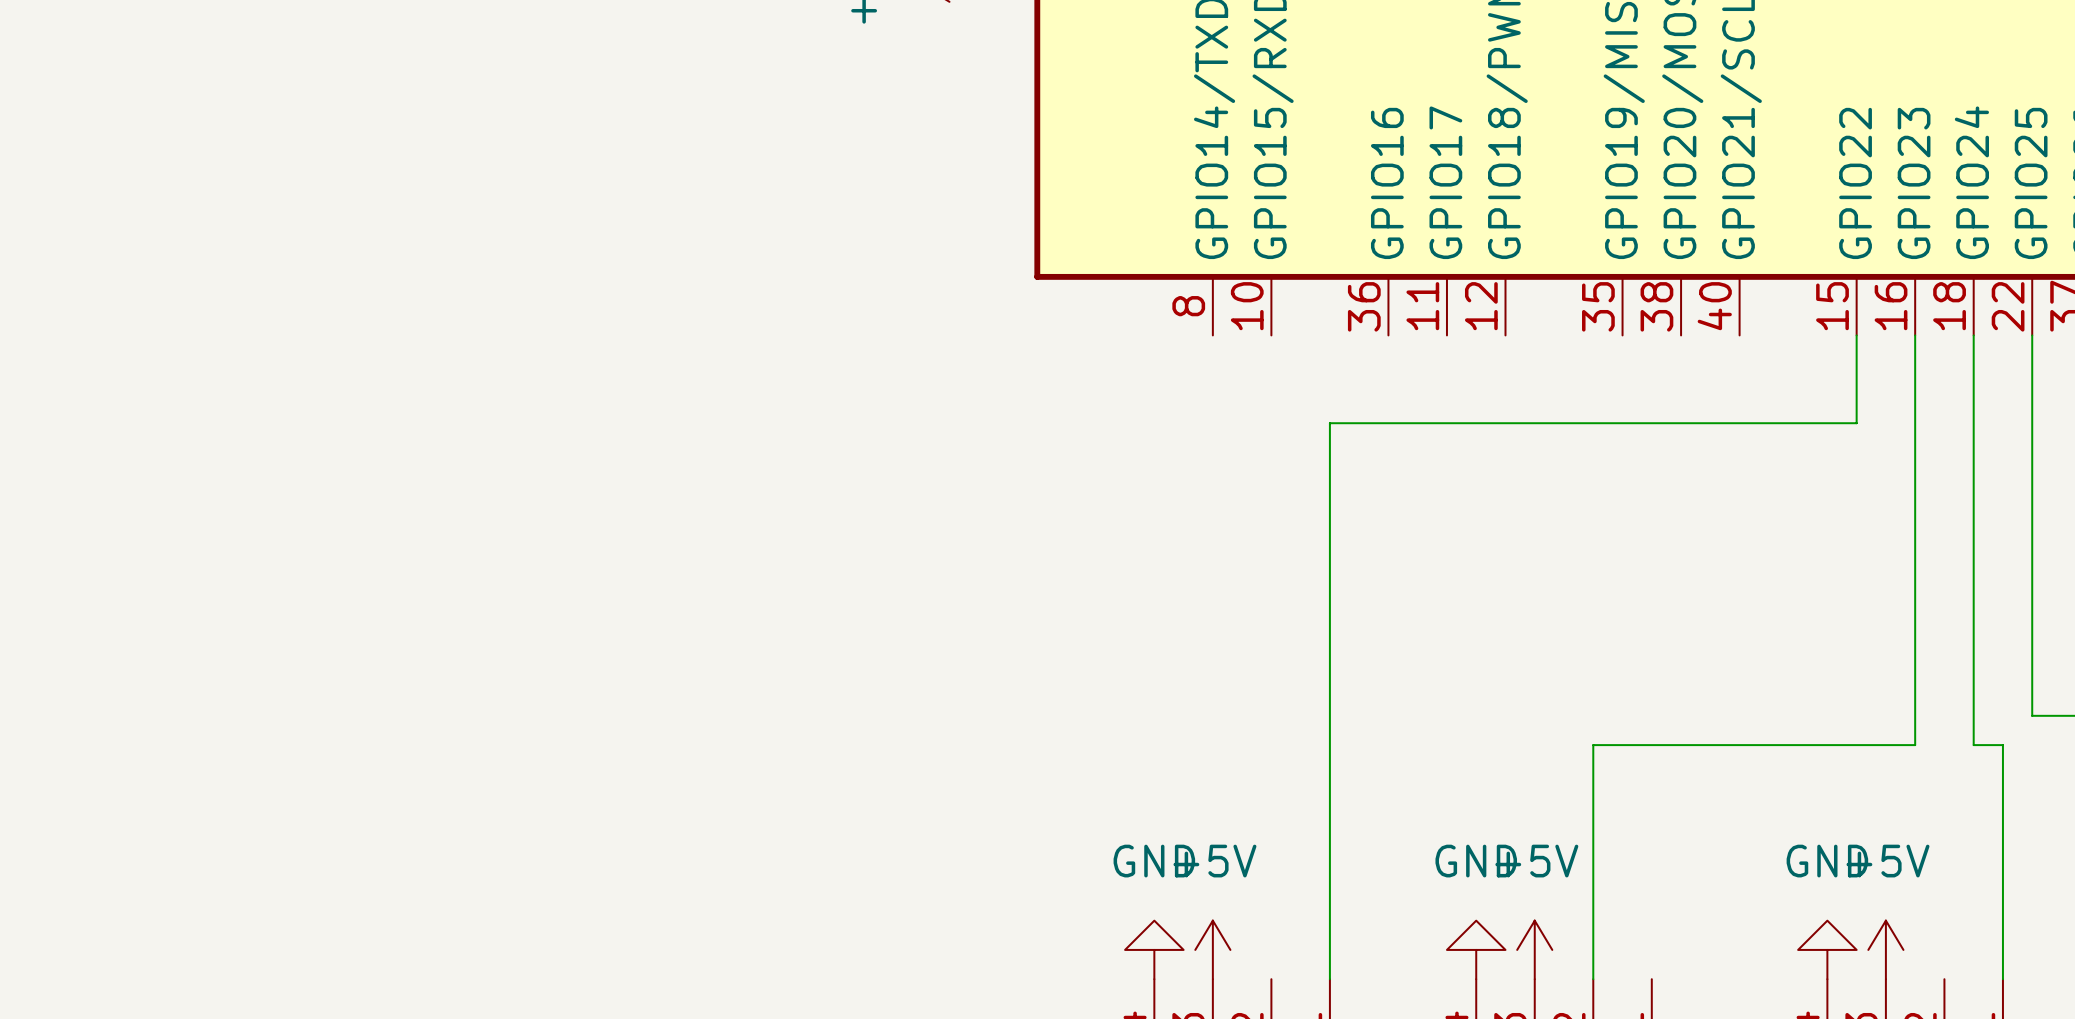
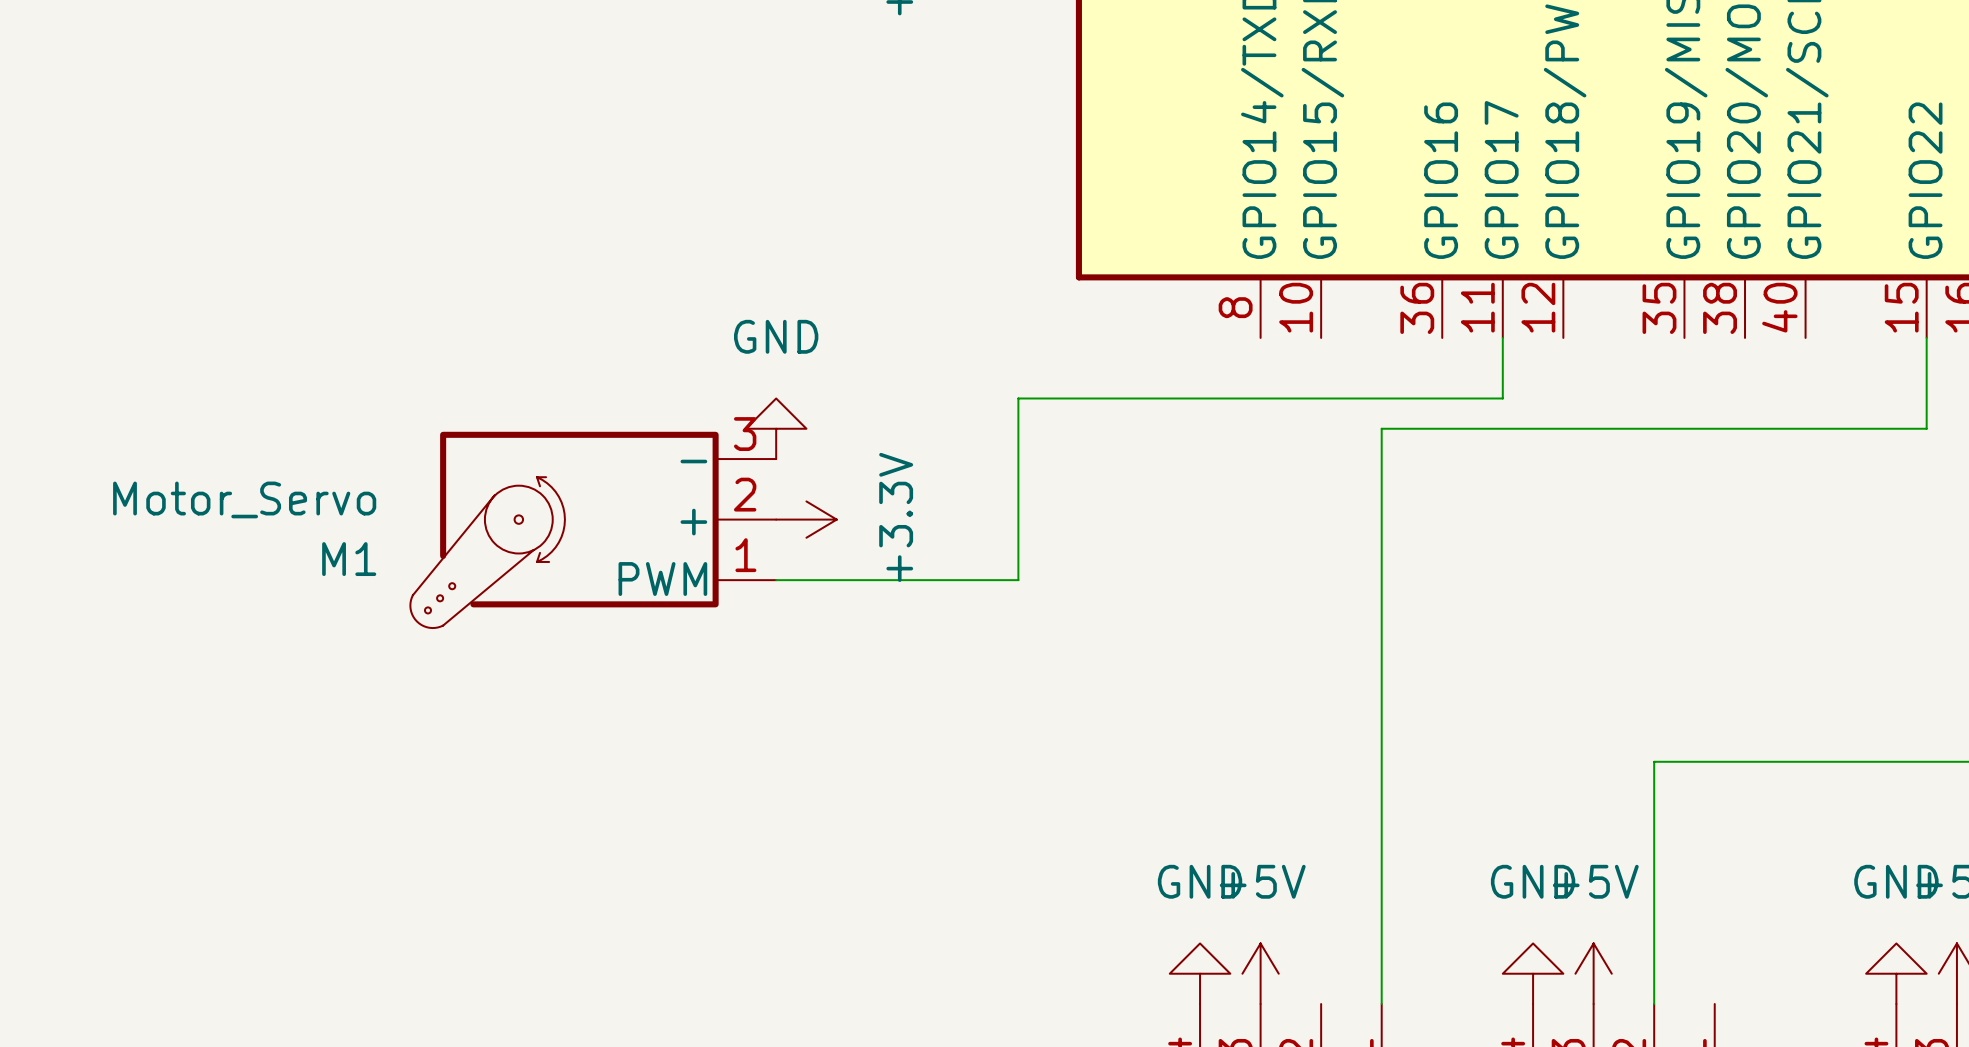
wire: none -> (1502, 337) (1502, 398) (1018, 398) (1018, 580) (776, 580)
power symbol: none -> GND (776, 428)
power symbol: none -> +3.3V (806, 519)
M1: none -> Motor_Servo (593, 529)

